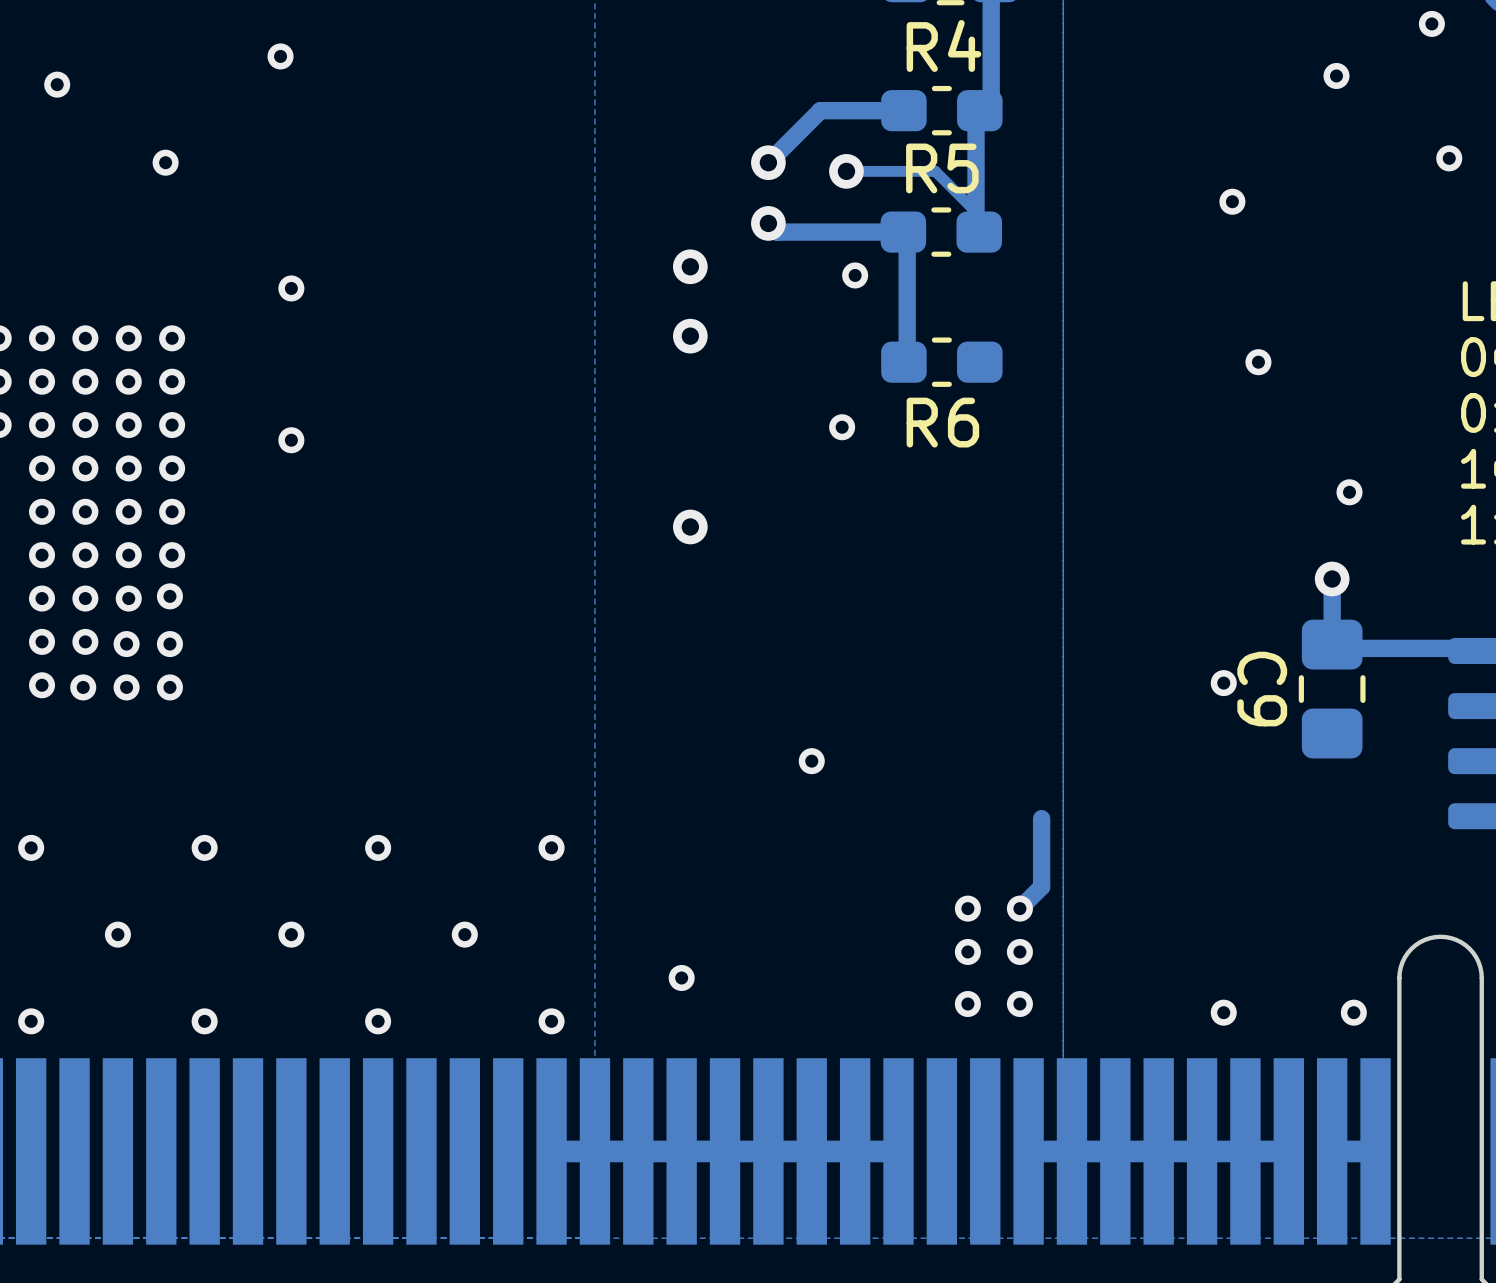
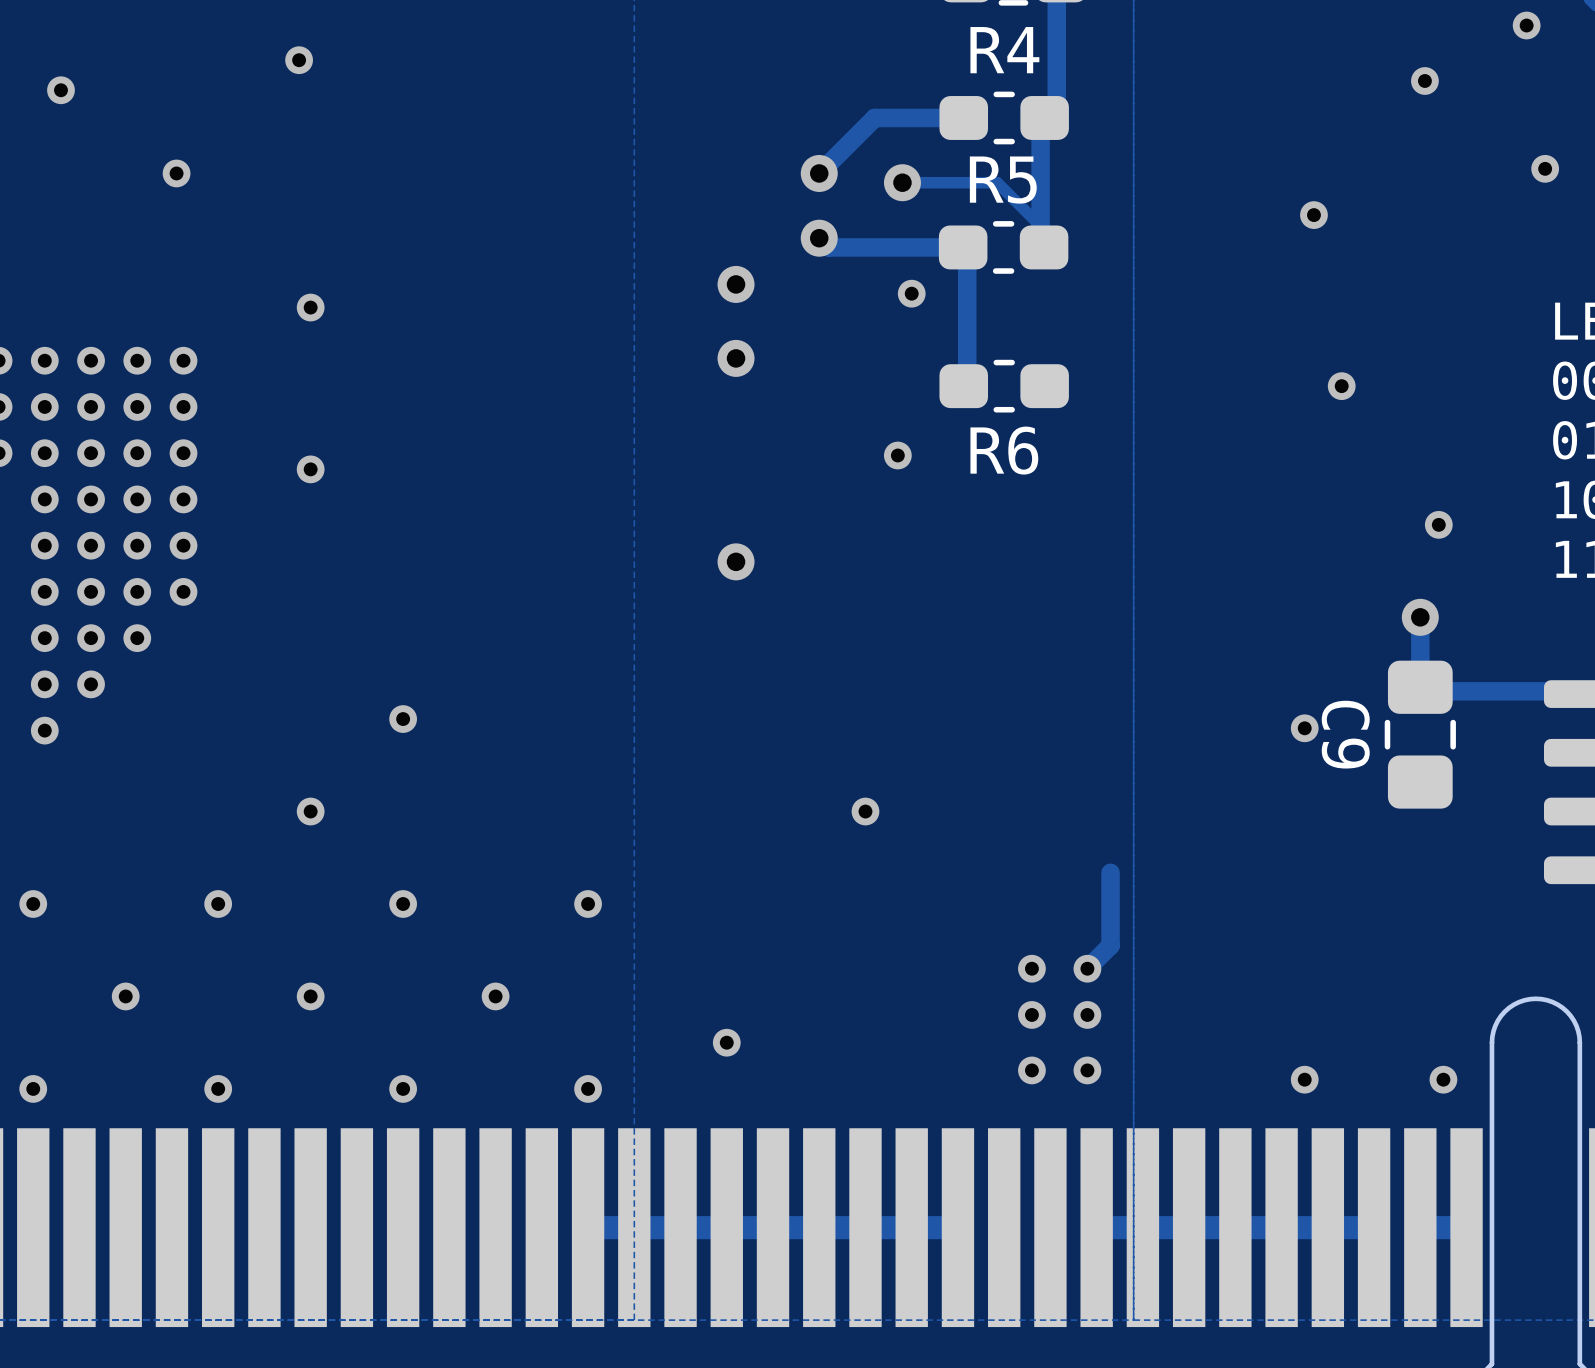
via: (169, 596) -> none
via: (126, 644) -> none
via: (169, 644) -> none
via: none -> (403, 719)
via: (83, 687) -> none
via: (126, 687) -> none
via: (169, 687) -> none
via: none -> (310, 811)

